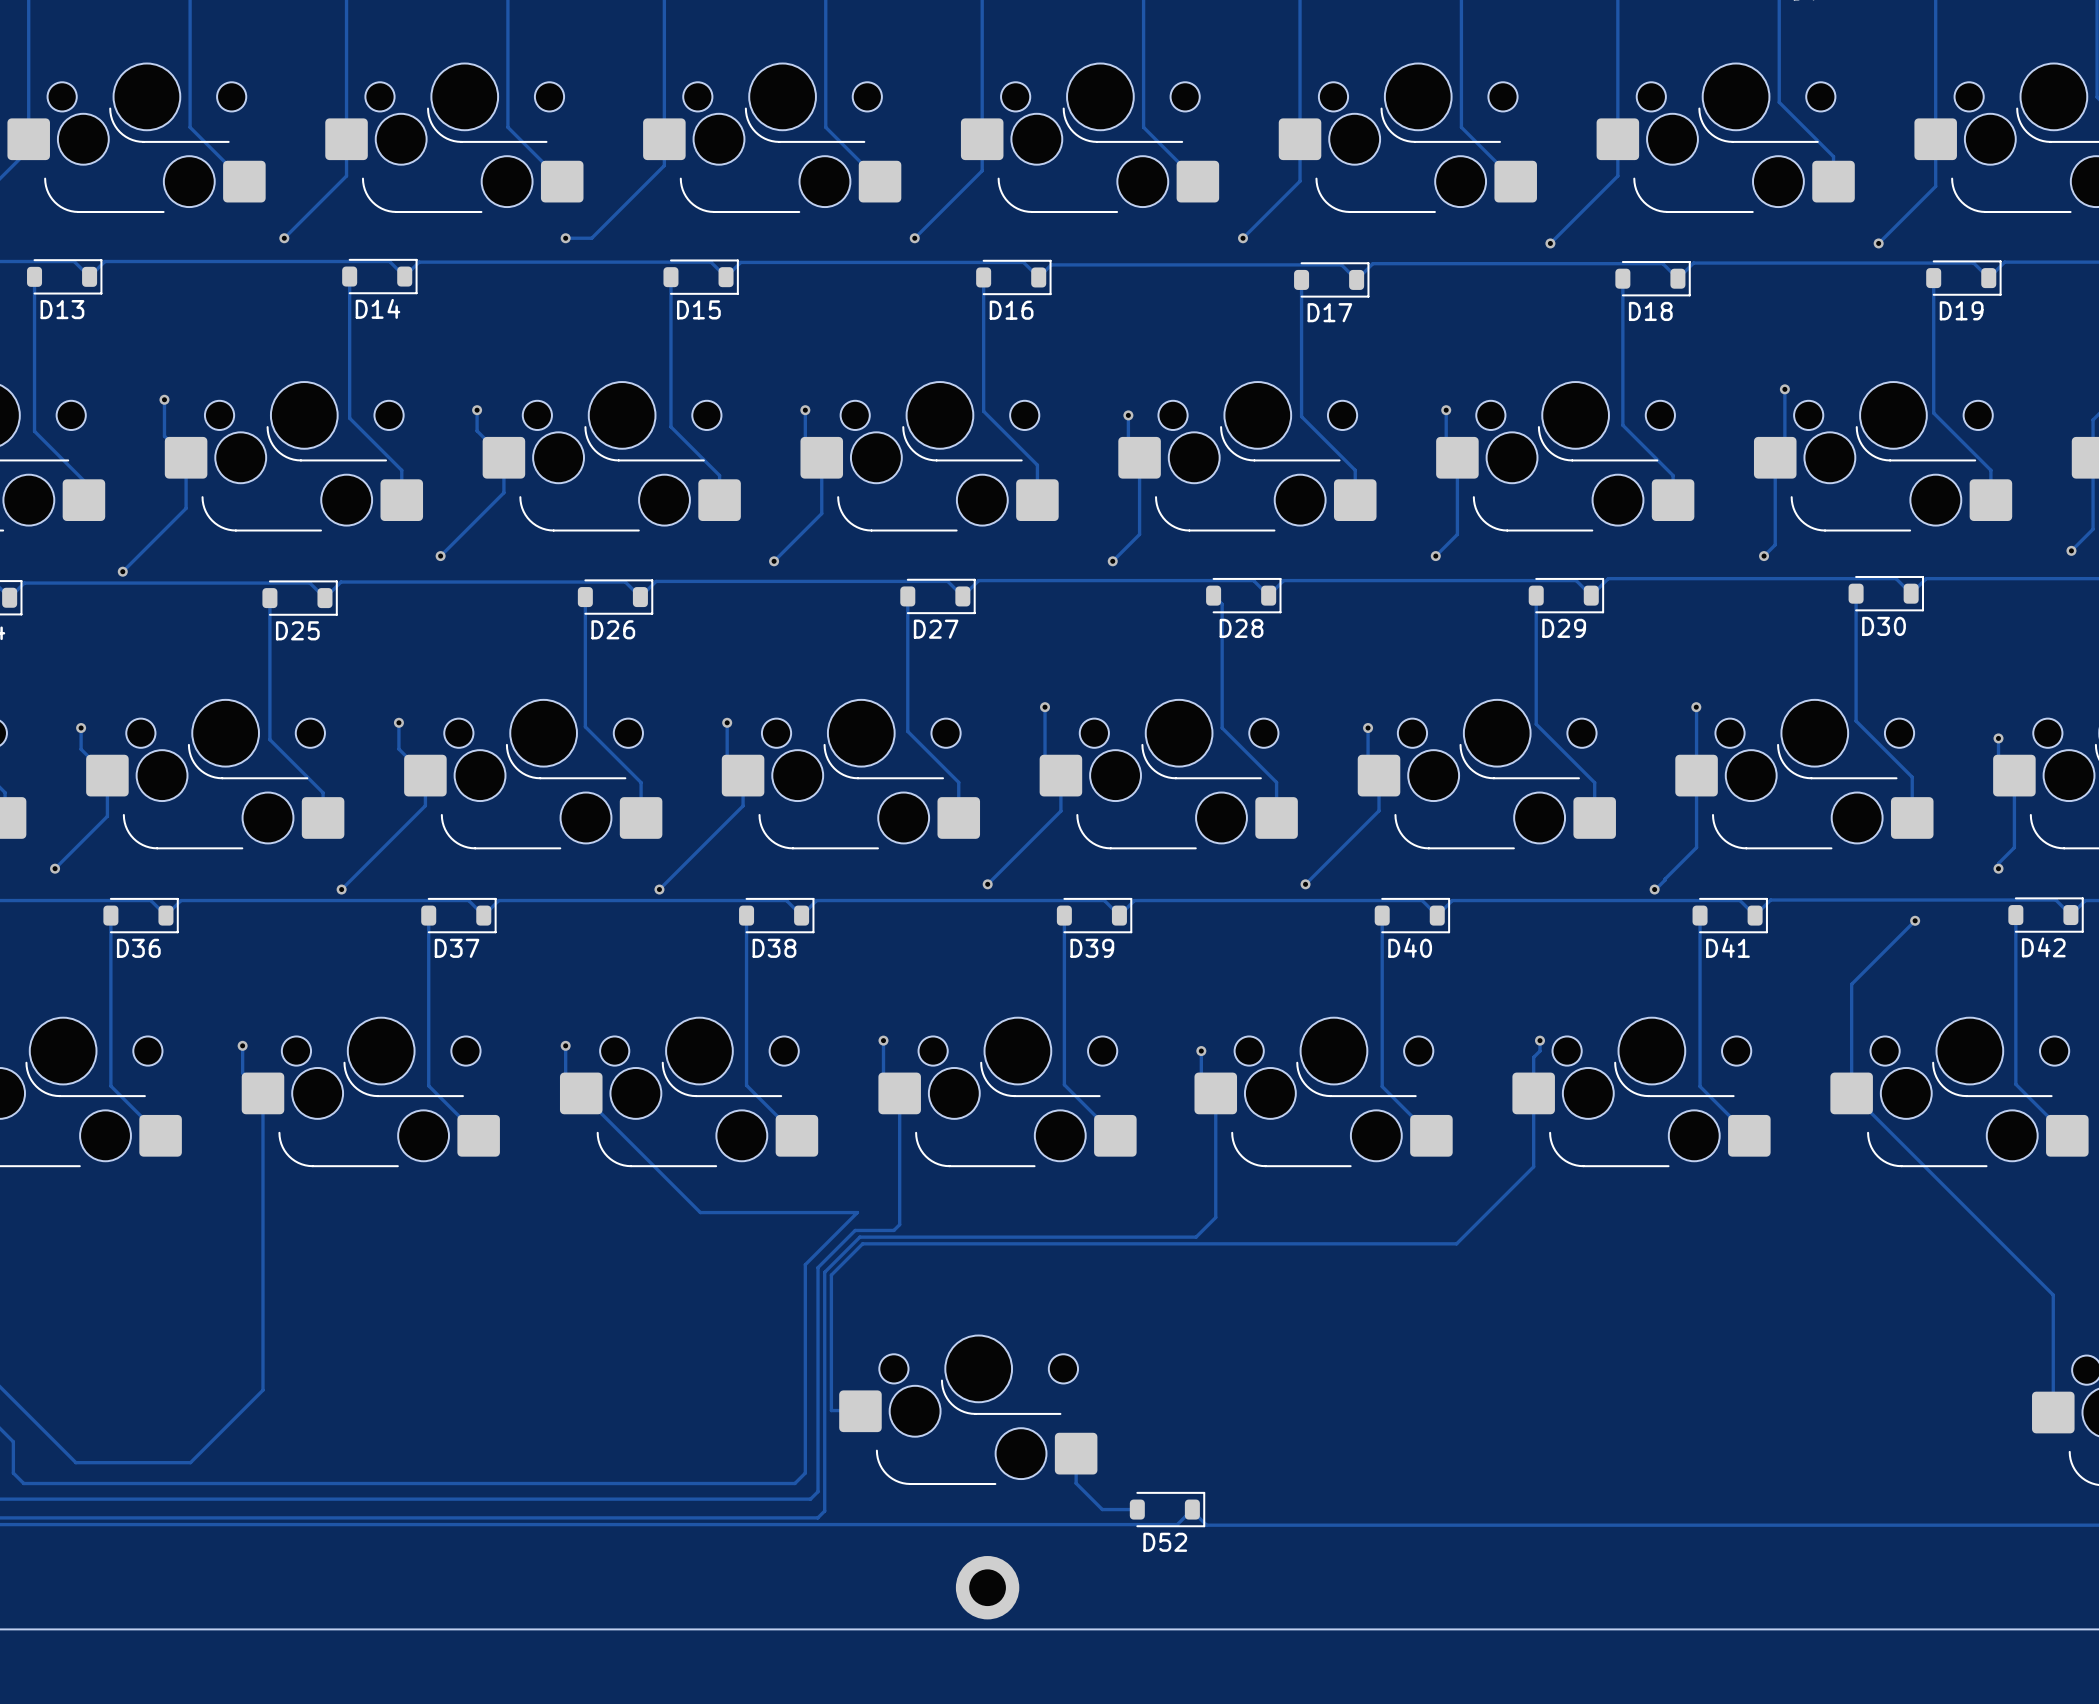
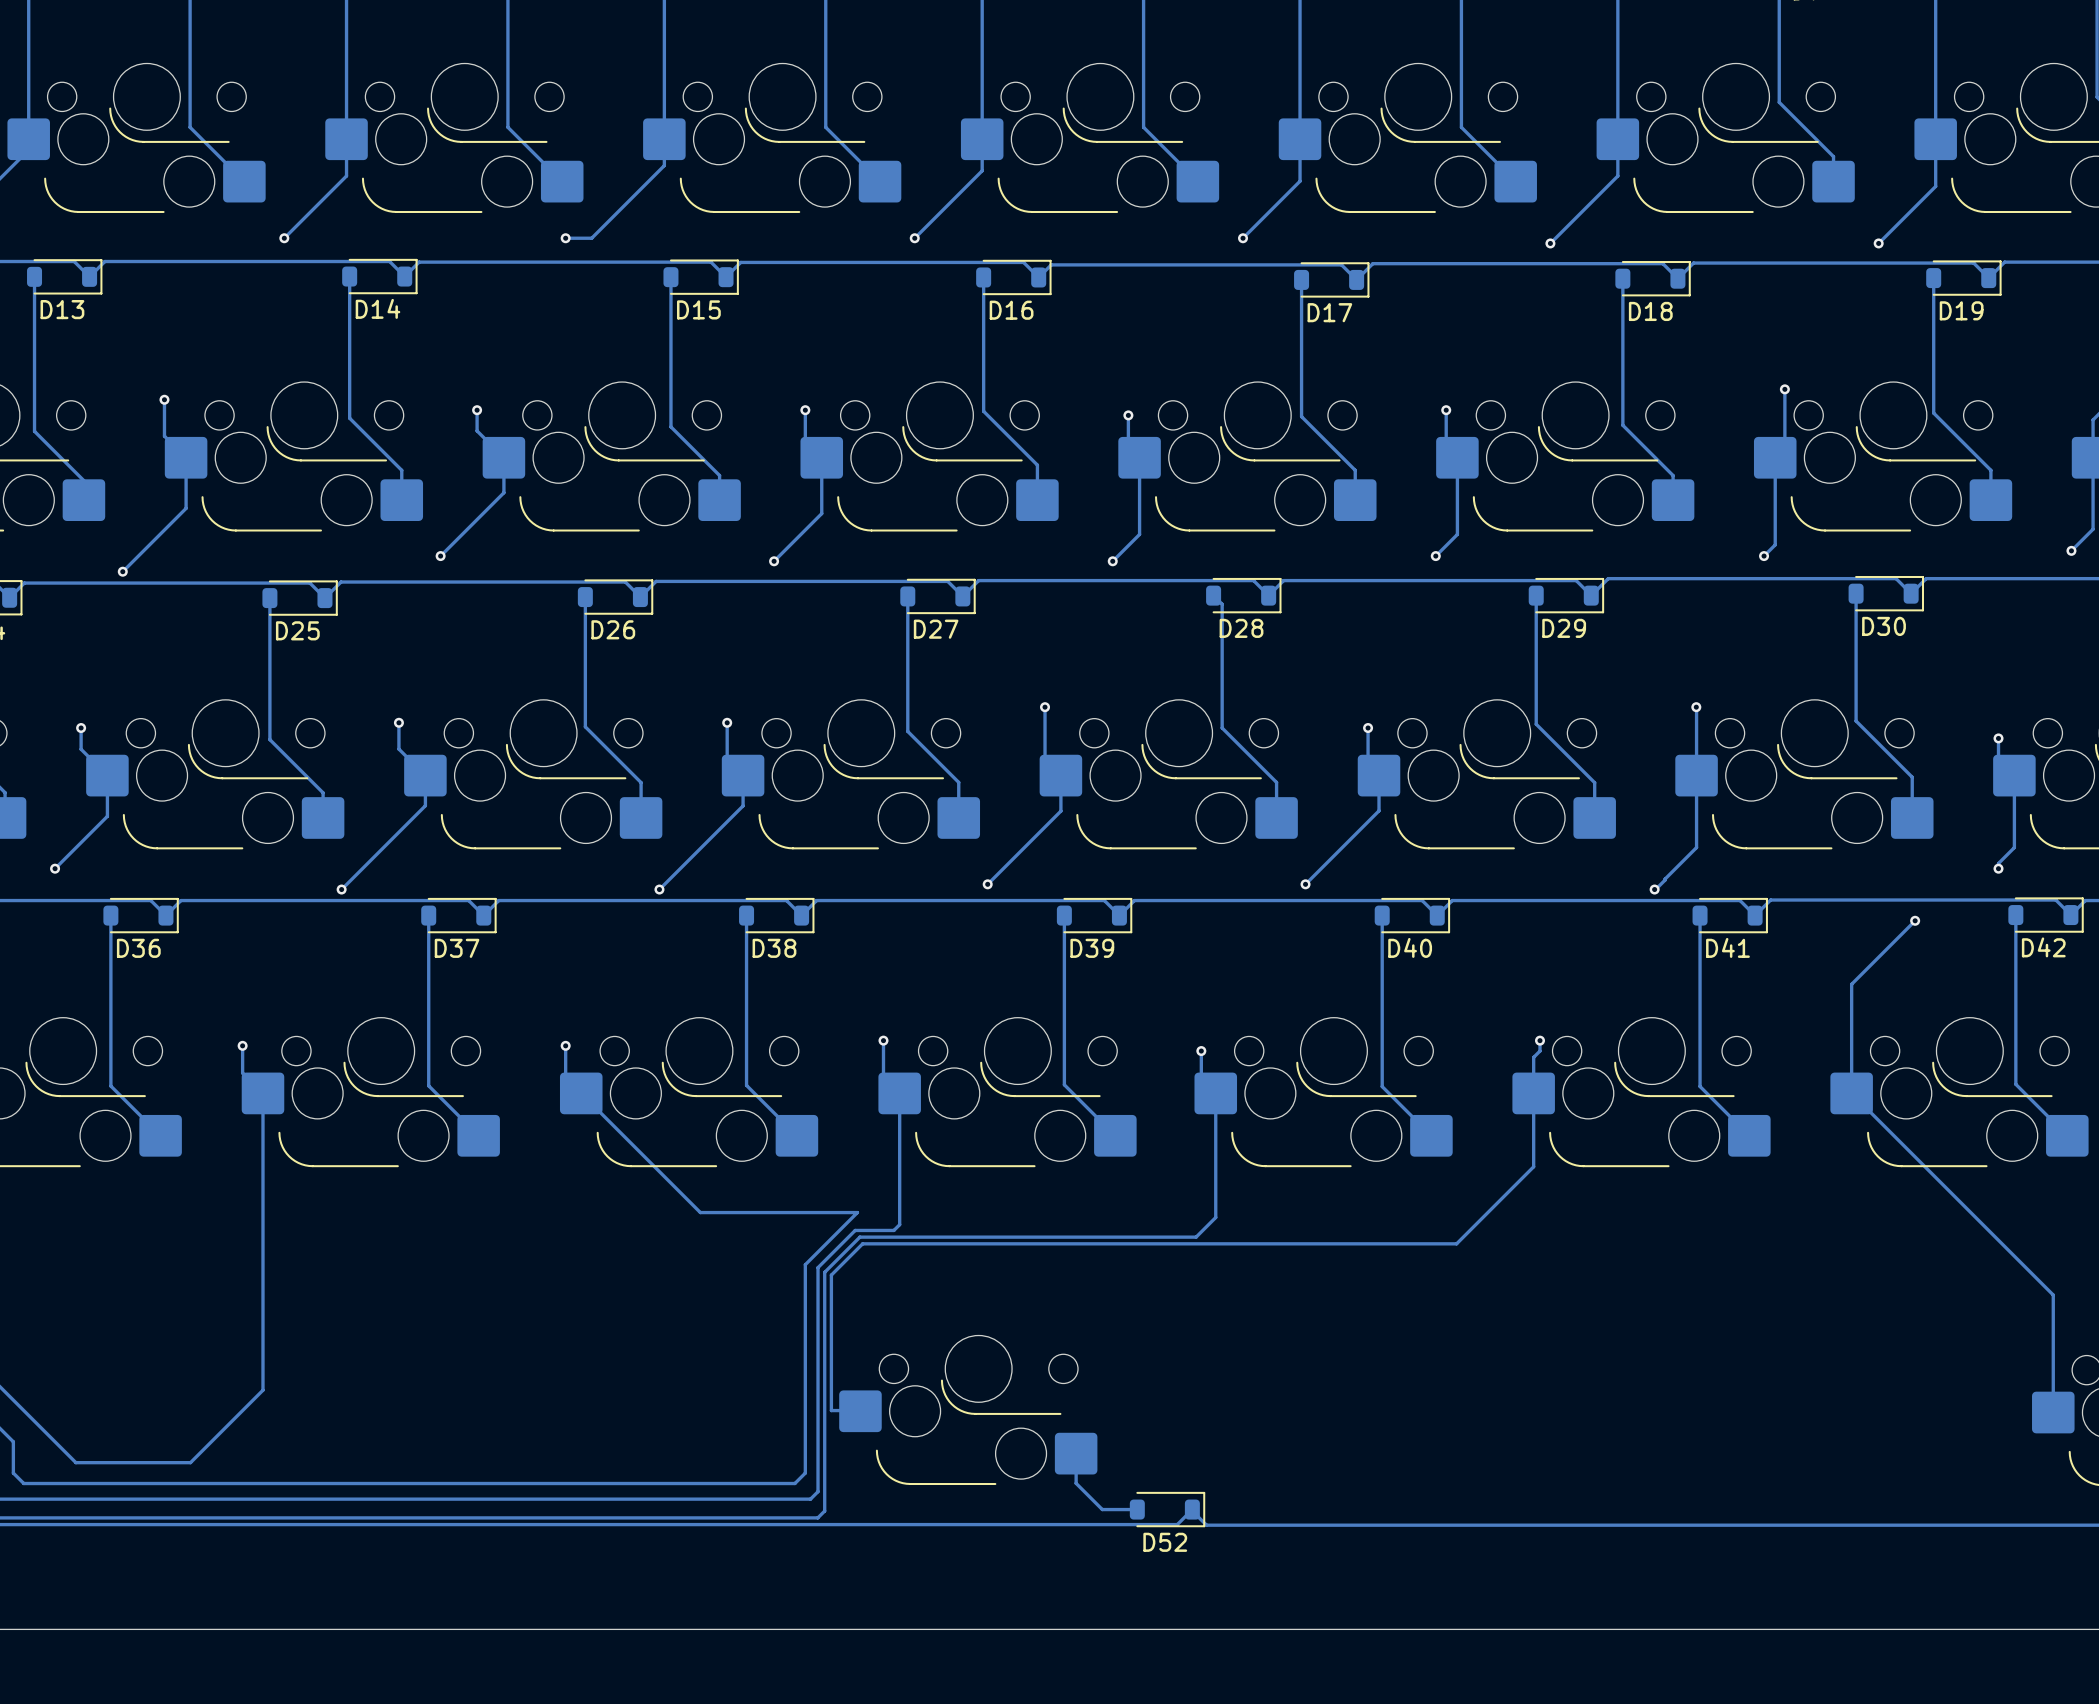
part: (987, 1587) -> none

